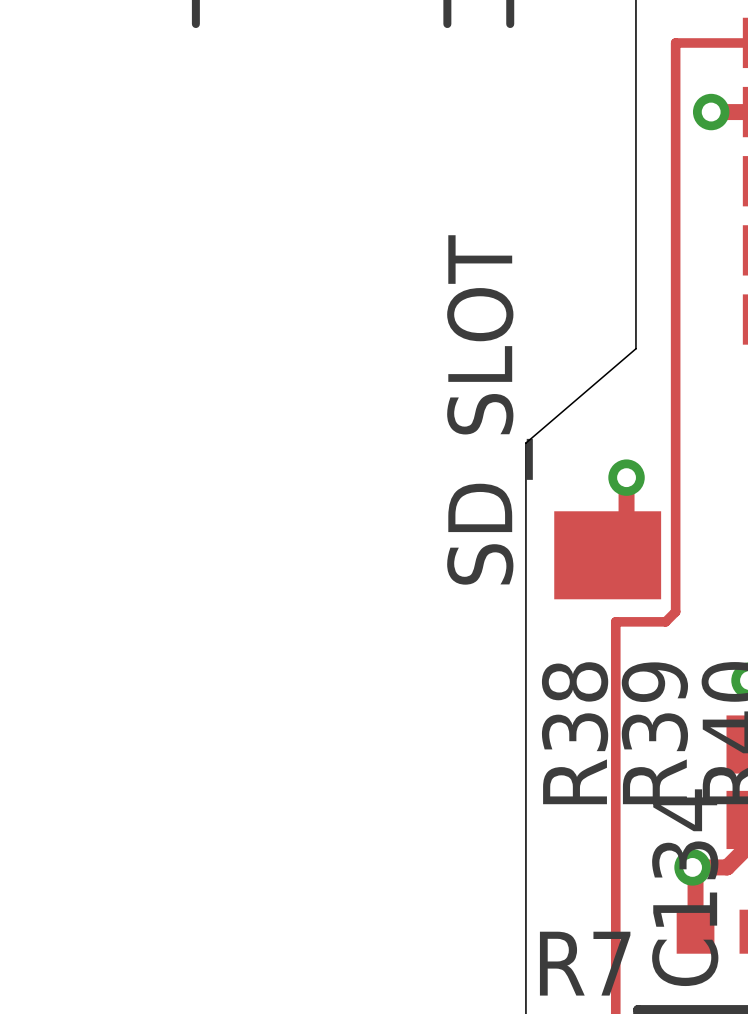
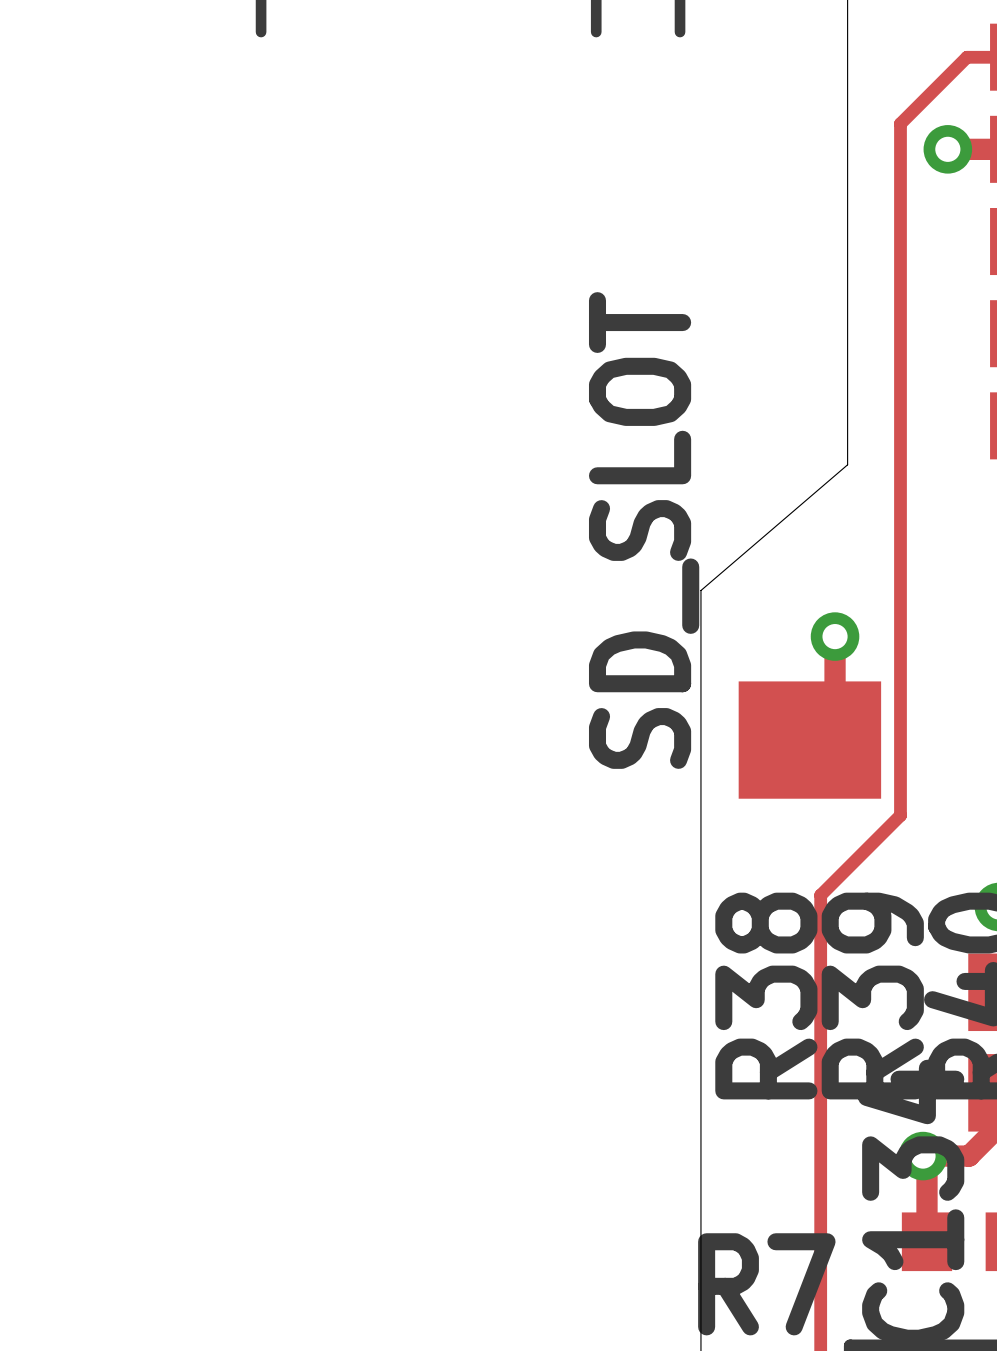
top track: (725, 42) (675, 42) (675, 92) -> (967, 57) (900, 123)
top track: (665, 621) (615, 621) (615, 671) -> (887, 828) (820, 895)

